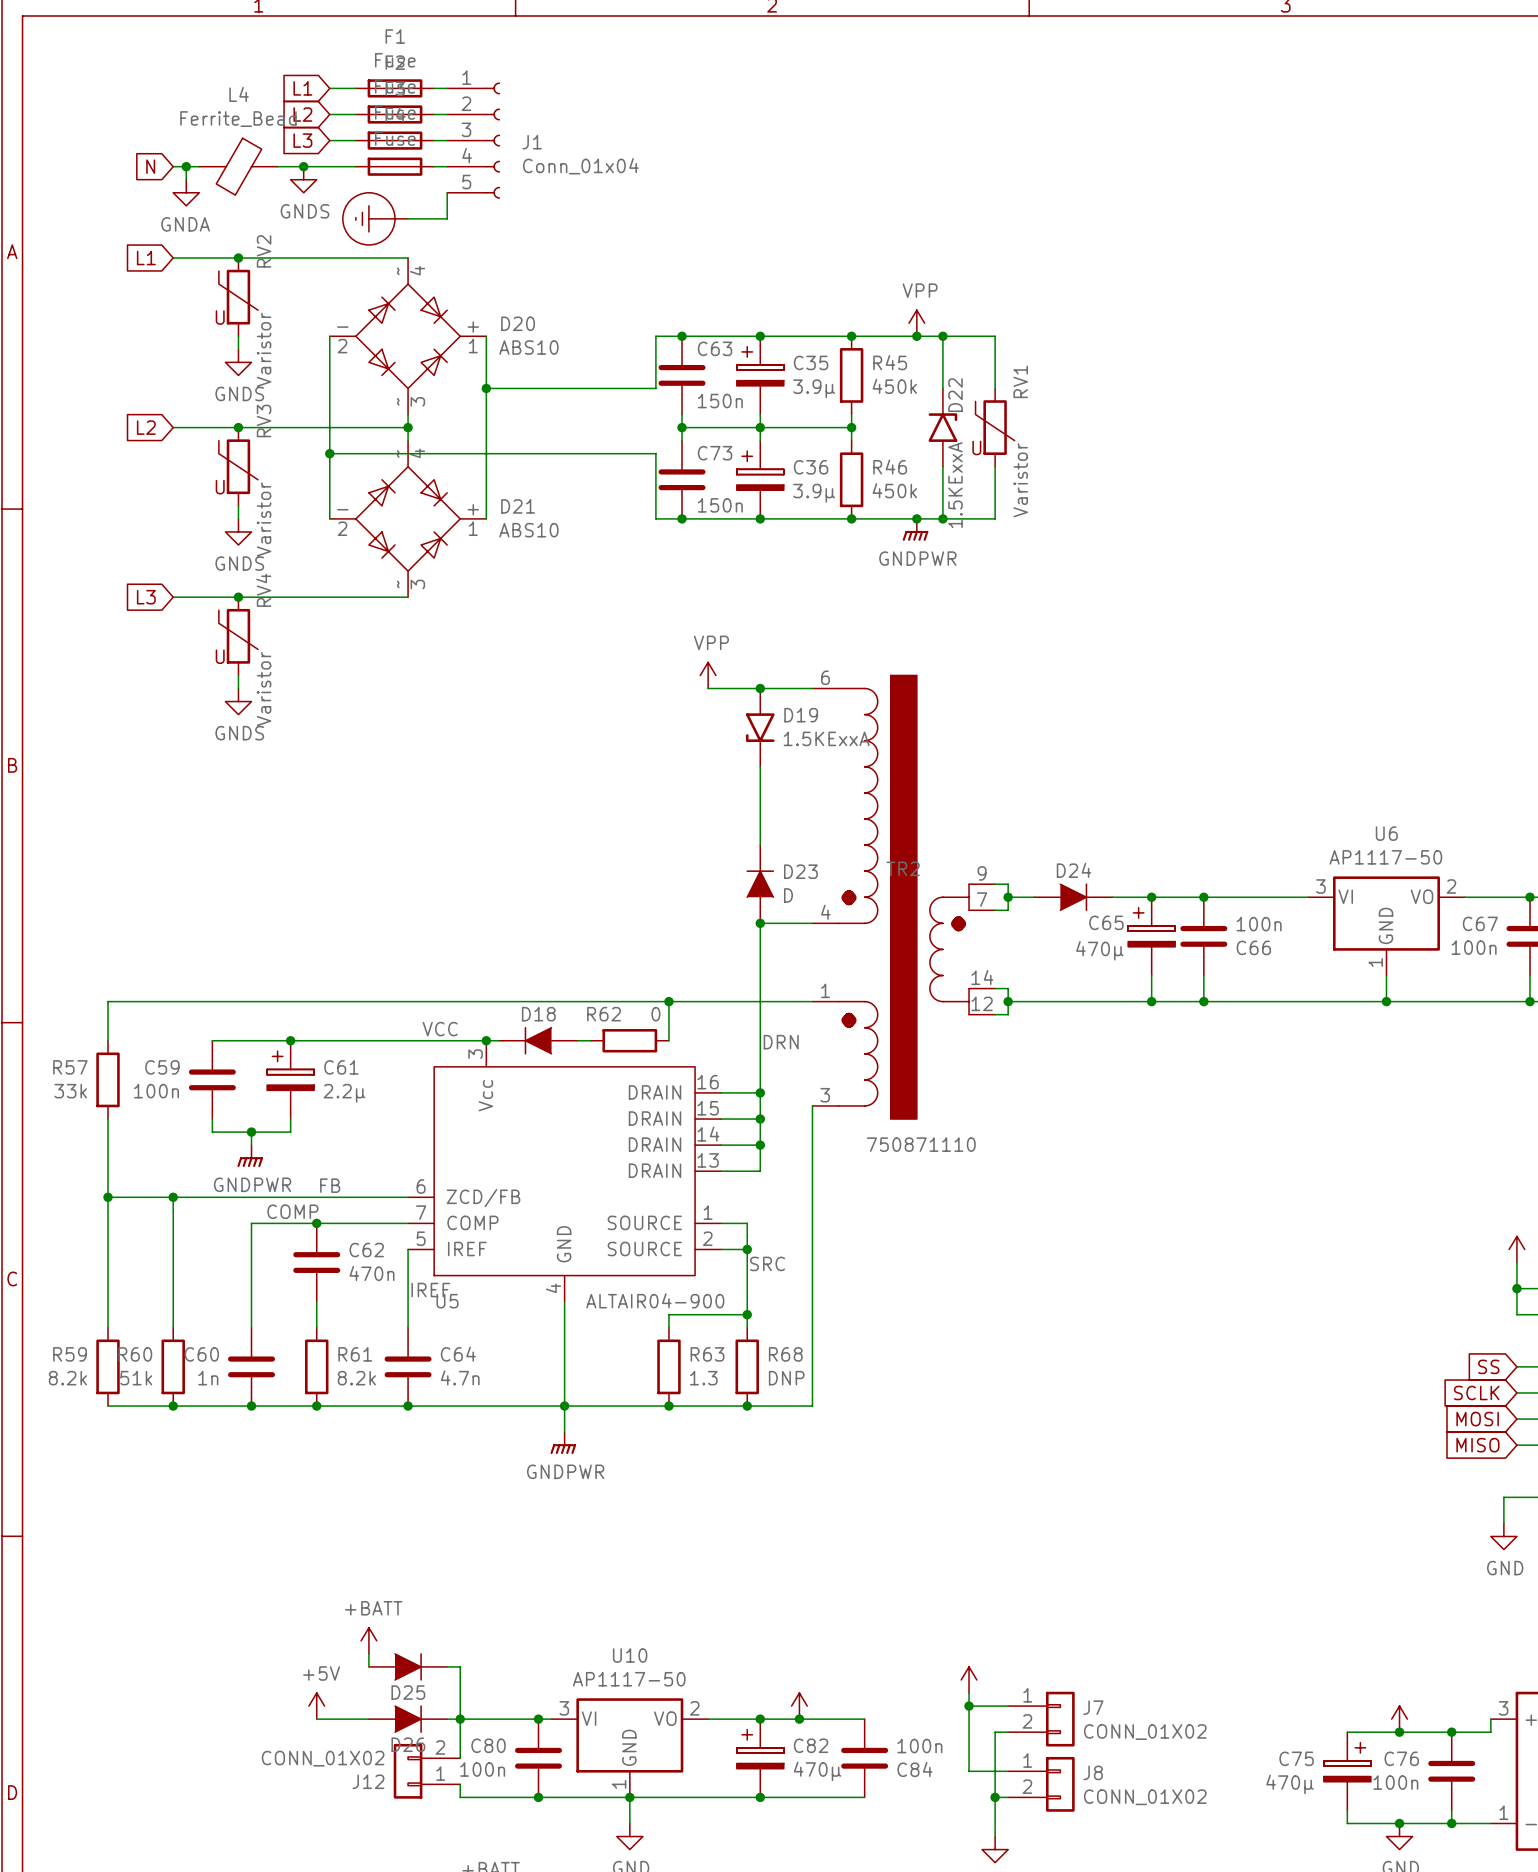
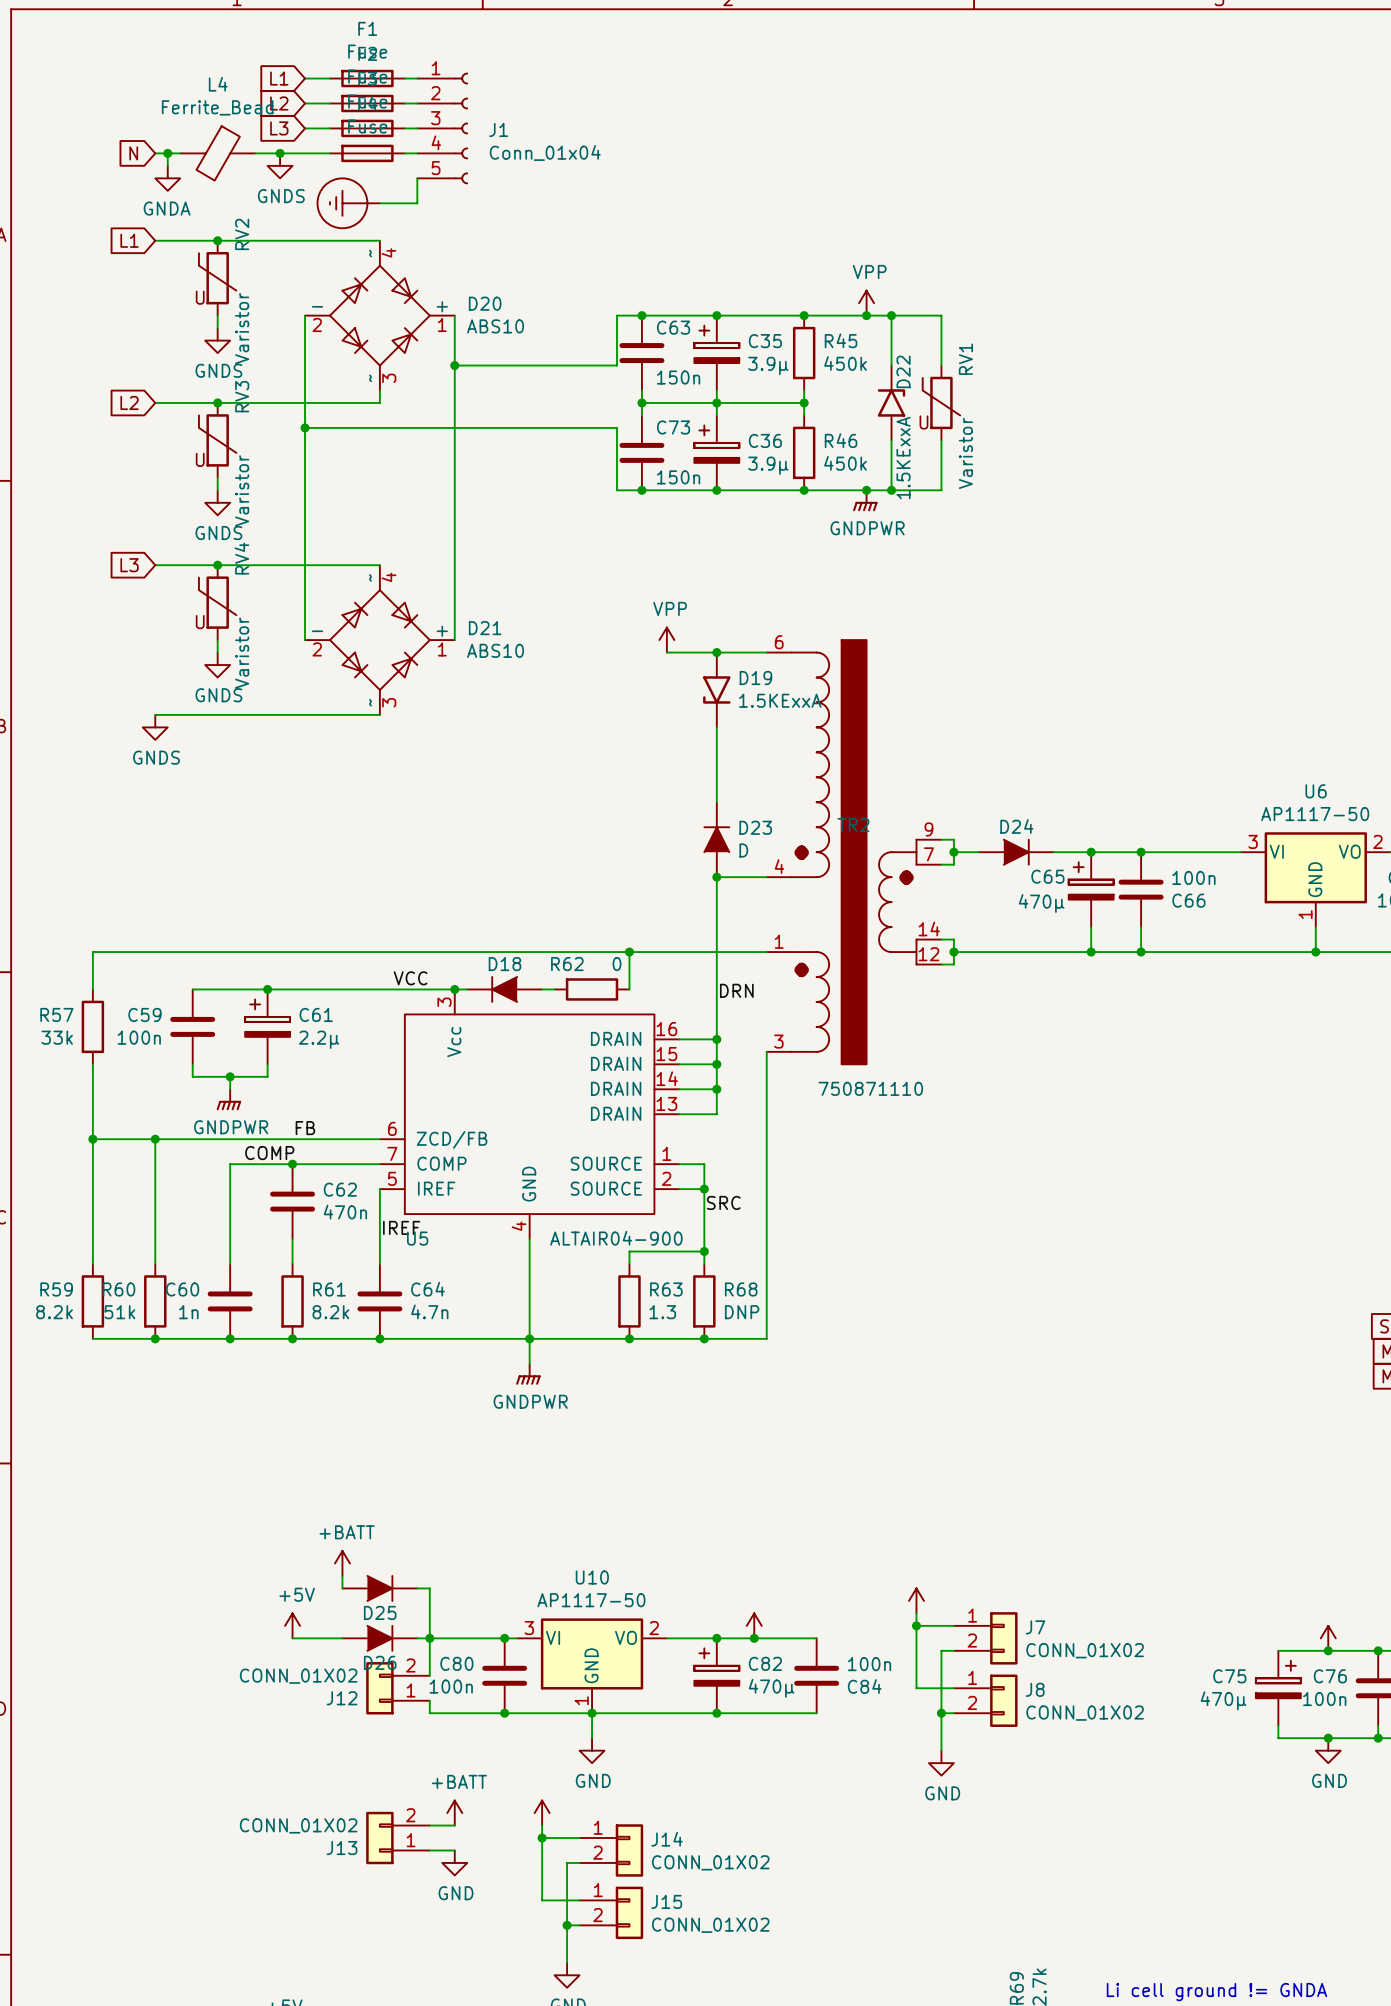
wire: (408, 427) (408, 440) -> none
junction: (408, 427) -> none
wire: none -> (305, 490) (305, 640)
D21 position: (408, 518) -> (379, 640)
wire: none -> (454, 490) (454, 640)
wire: none -> (155, 714) (379, 714)
power symbol: none -> GNDS (155, 727)

